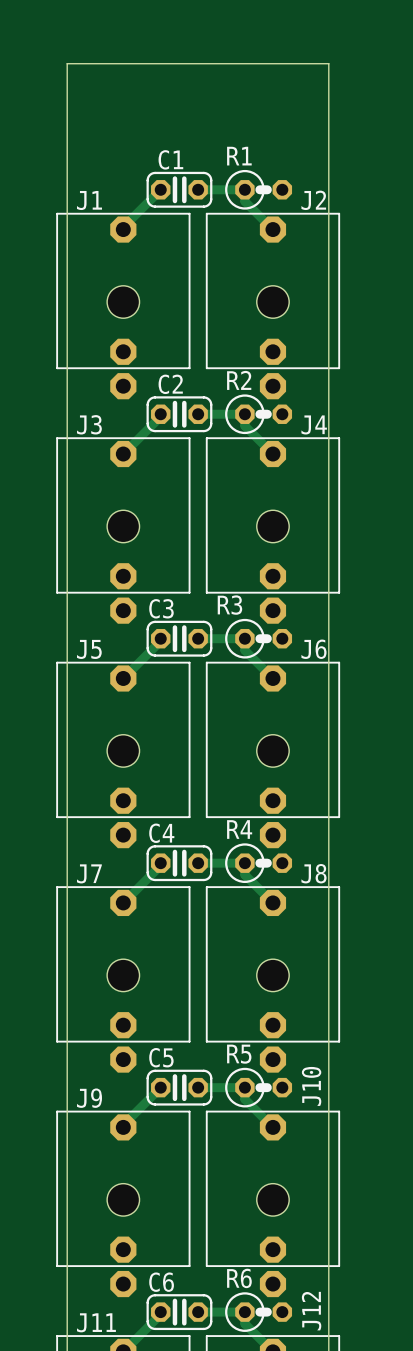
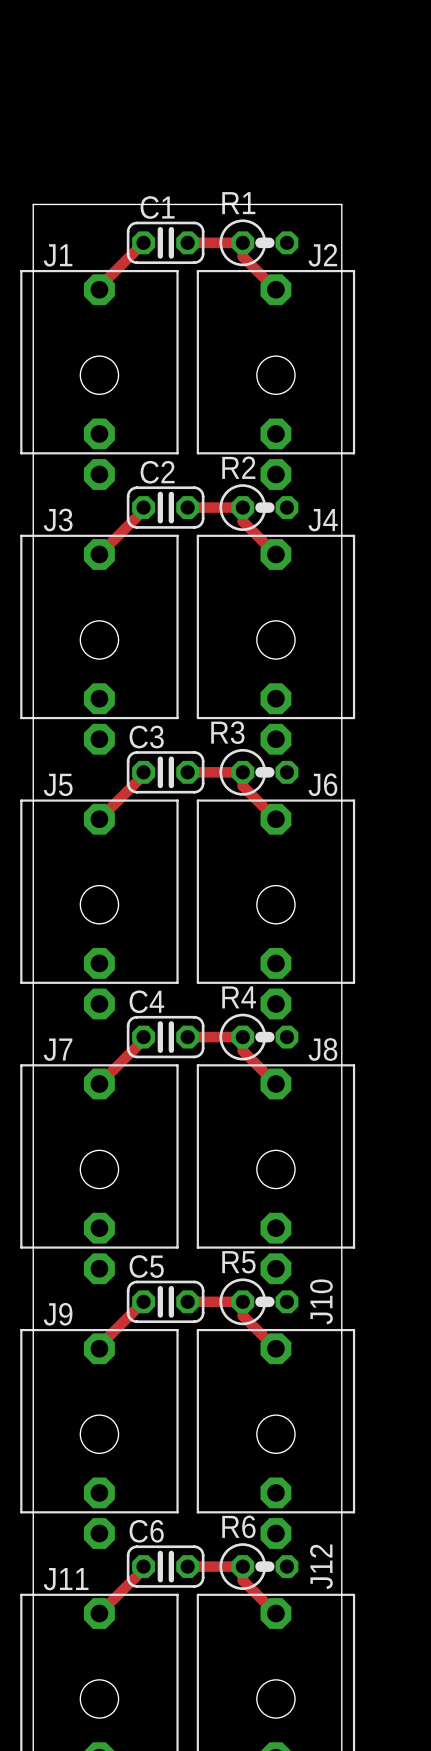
board edge: (67, 157) (67, 63) (328, 63) (328, 157) -> (33, 204) (341, 204)

